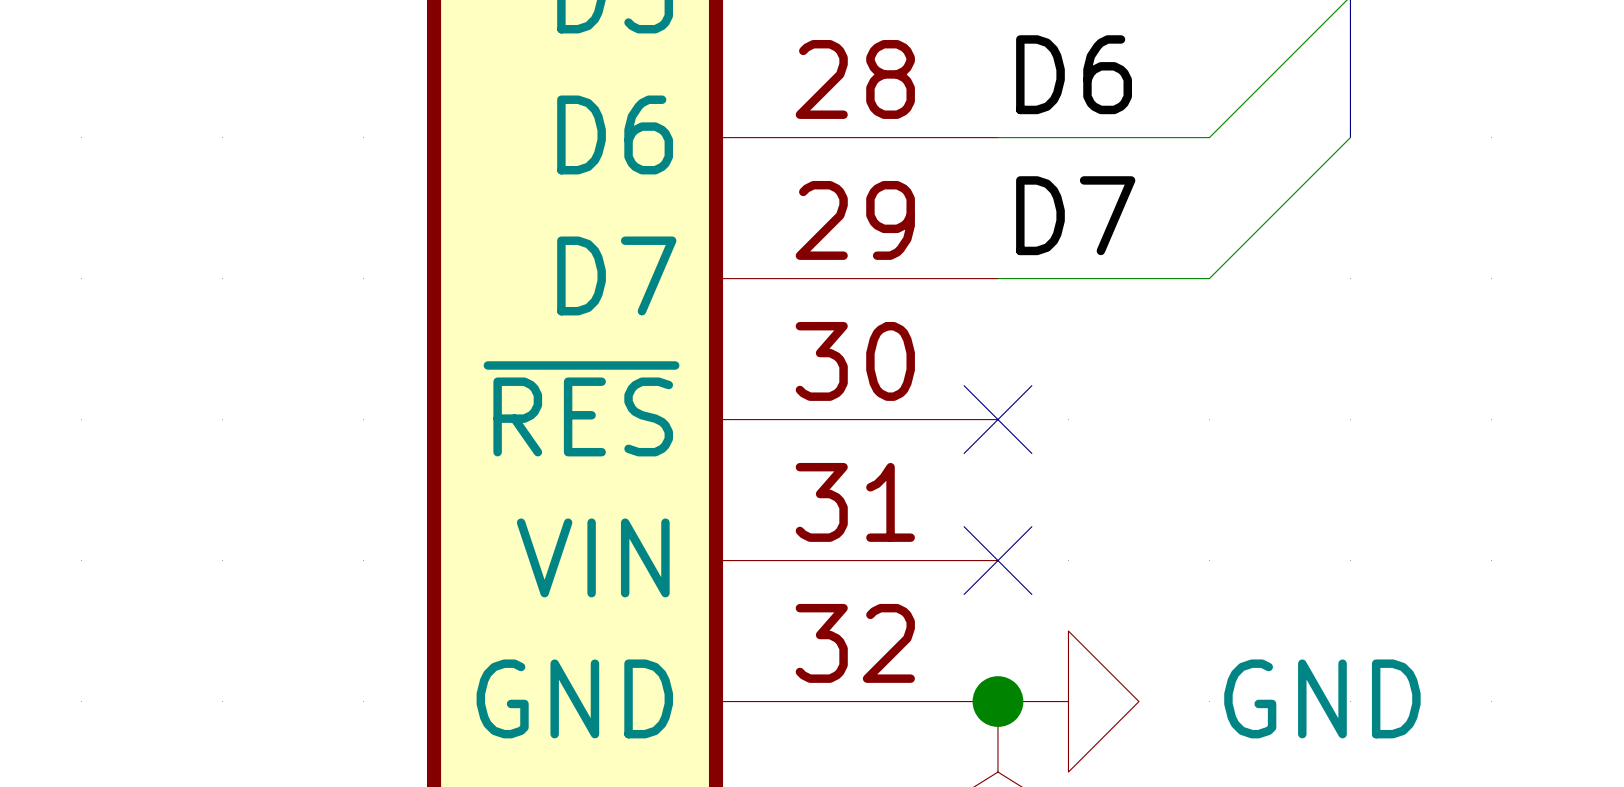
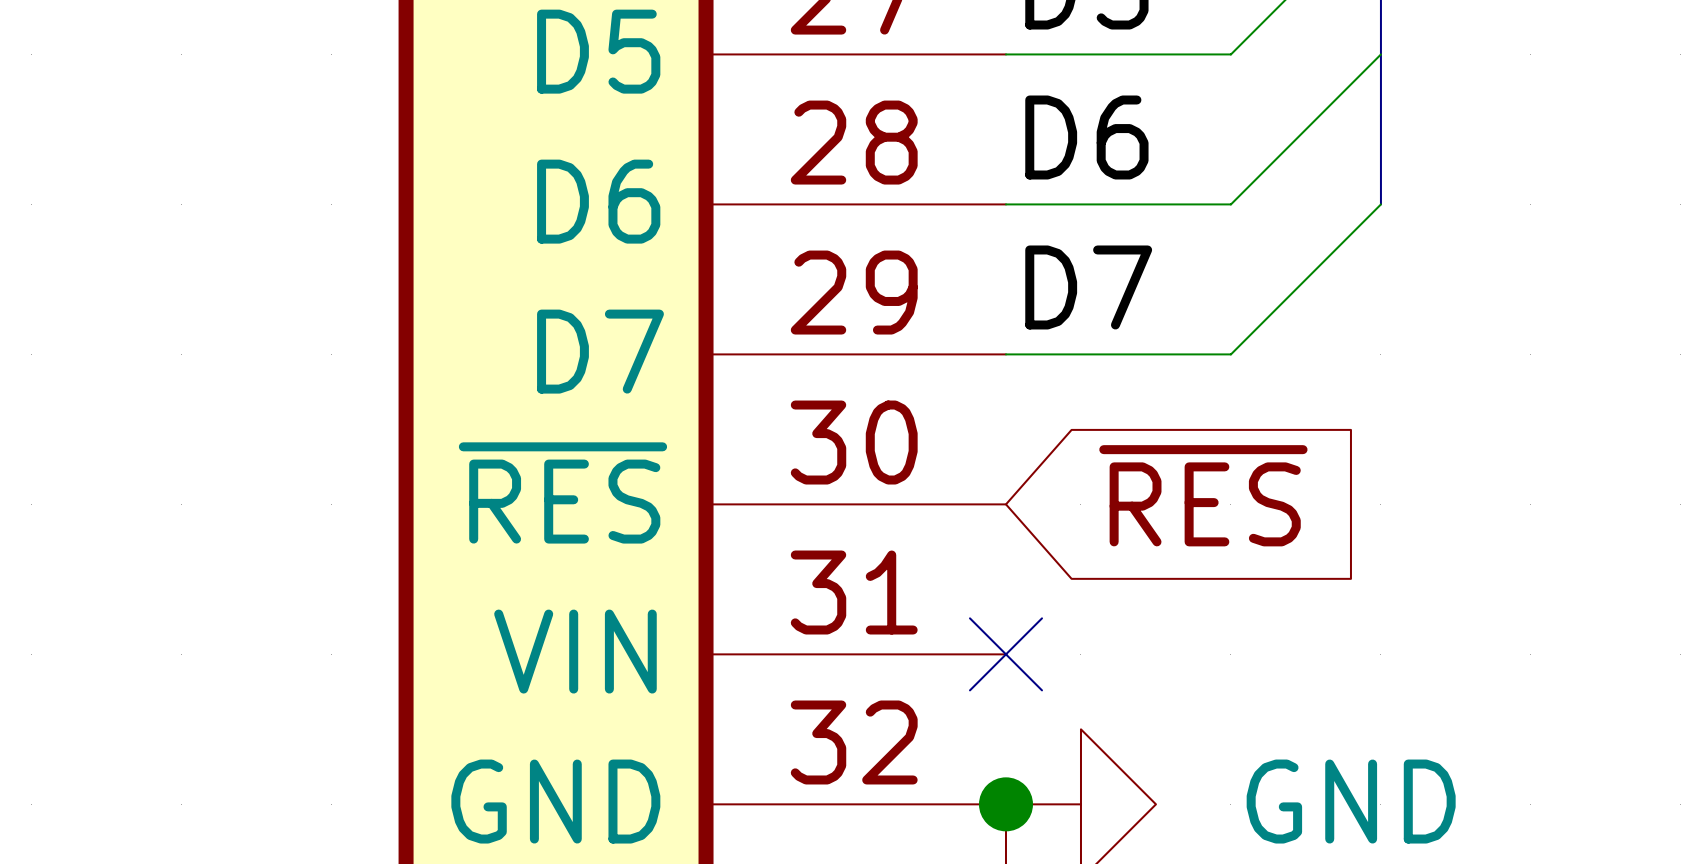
global label: none -> ~{RES} (1203, 495)
no-connect mark: (997, 419) -> none

